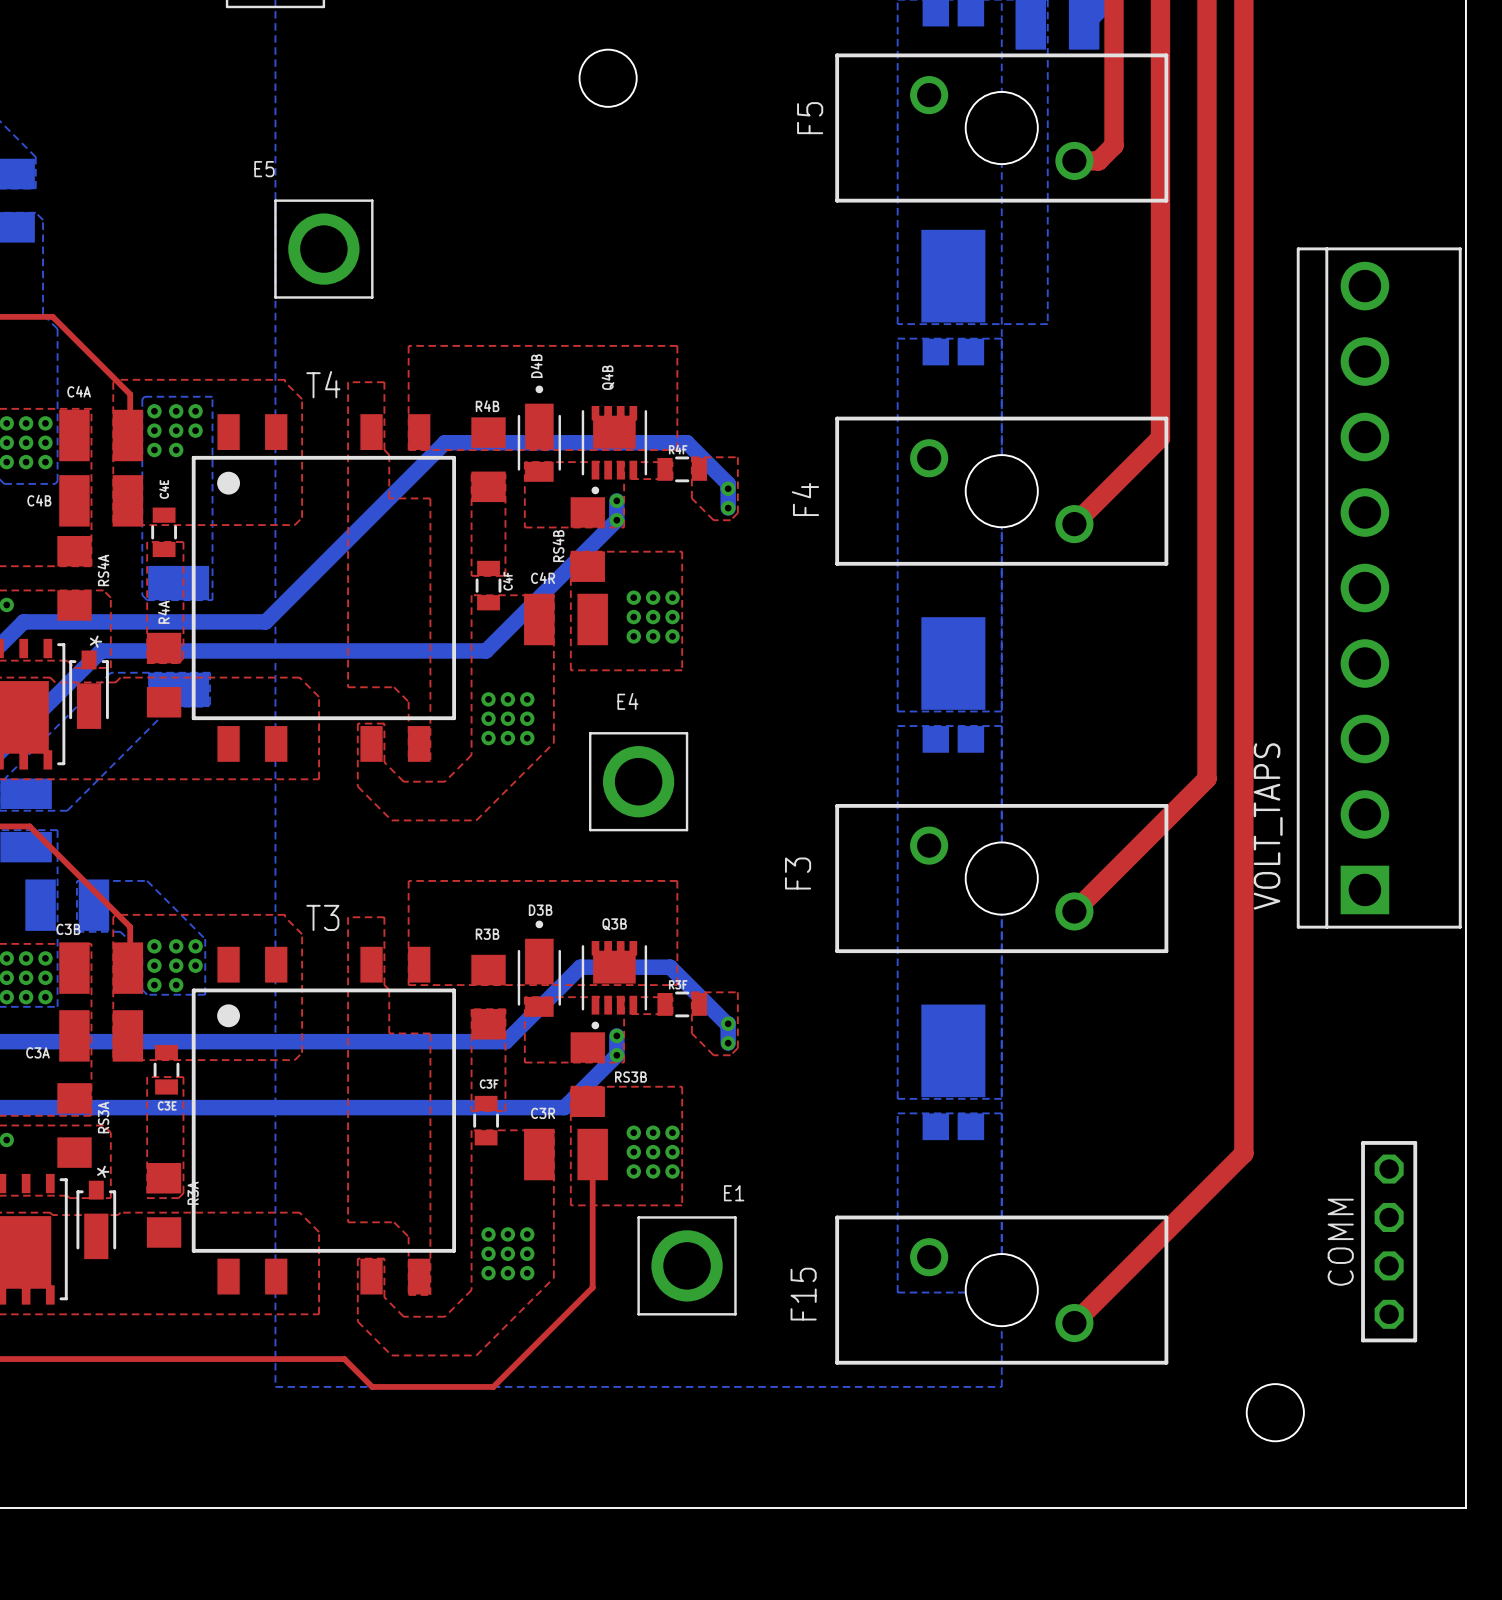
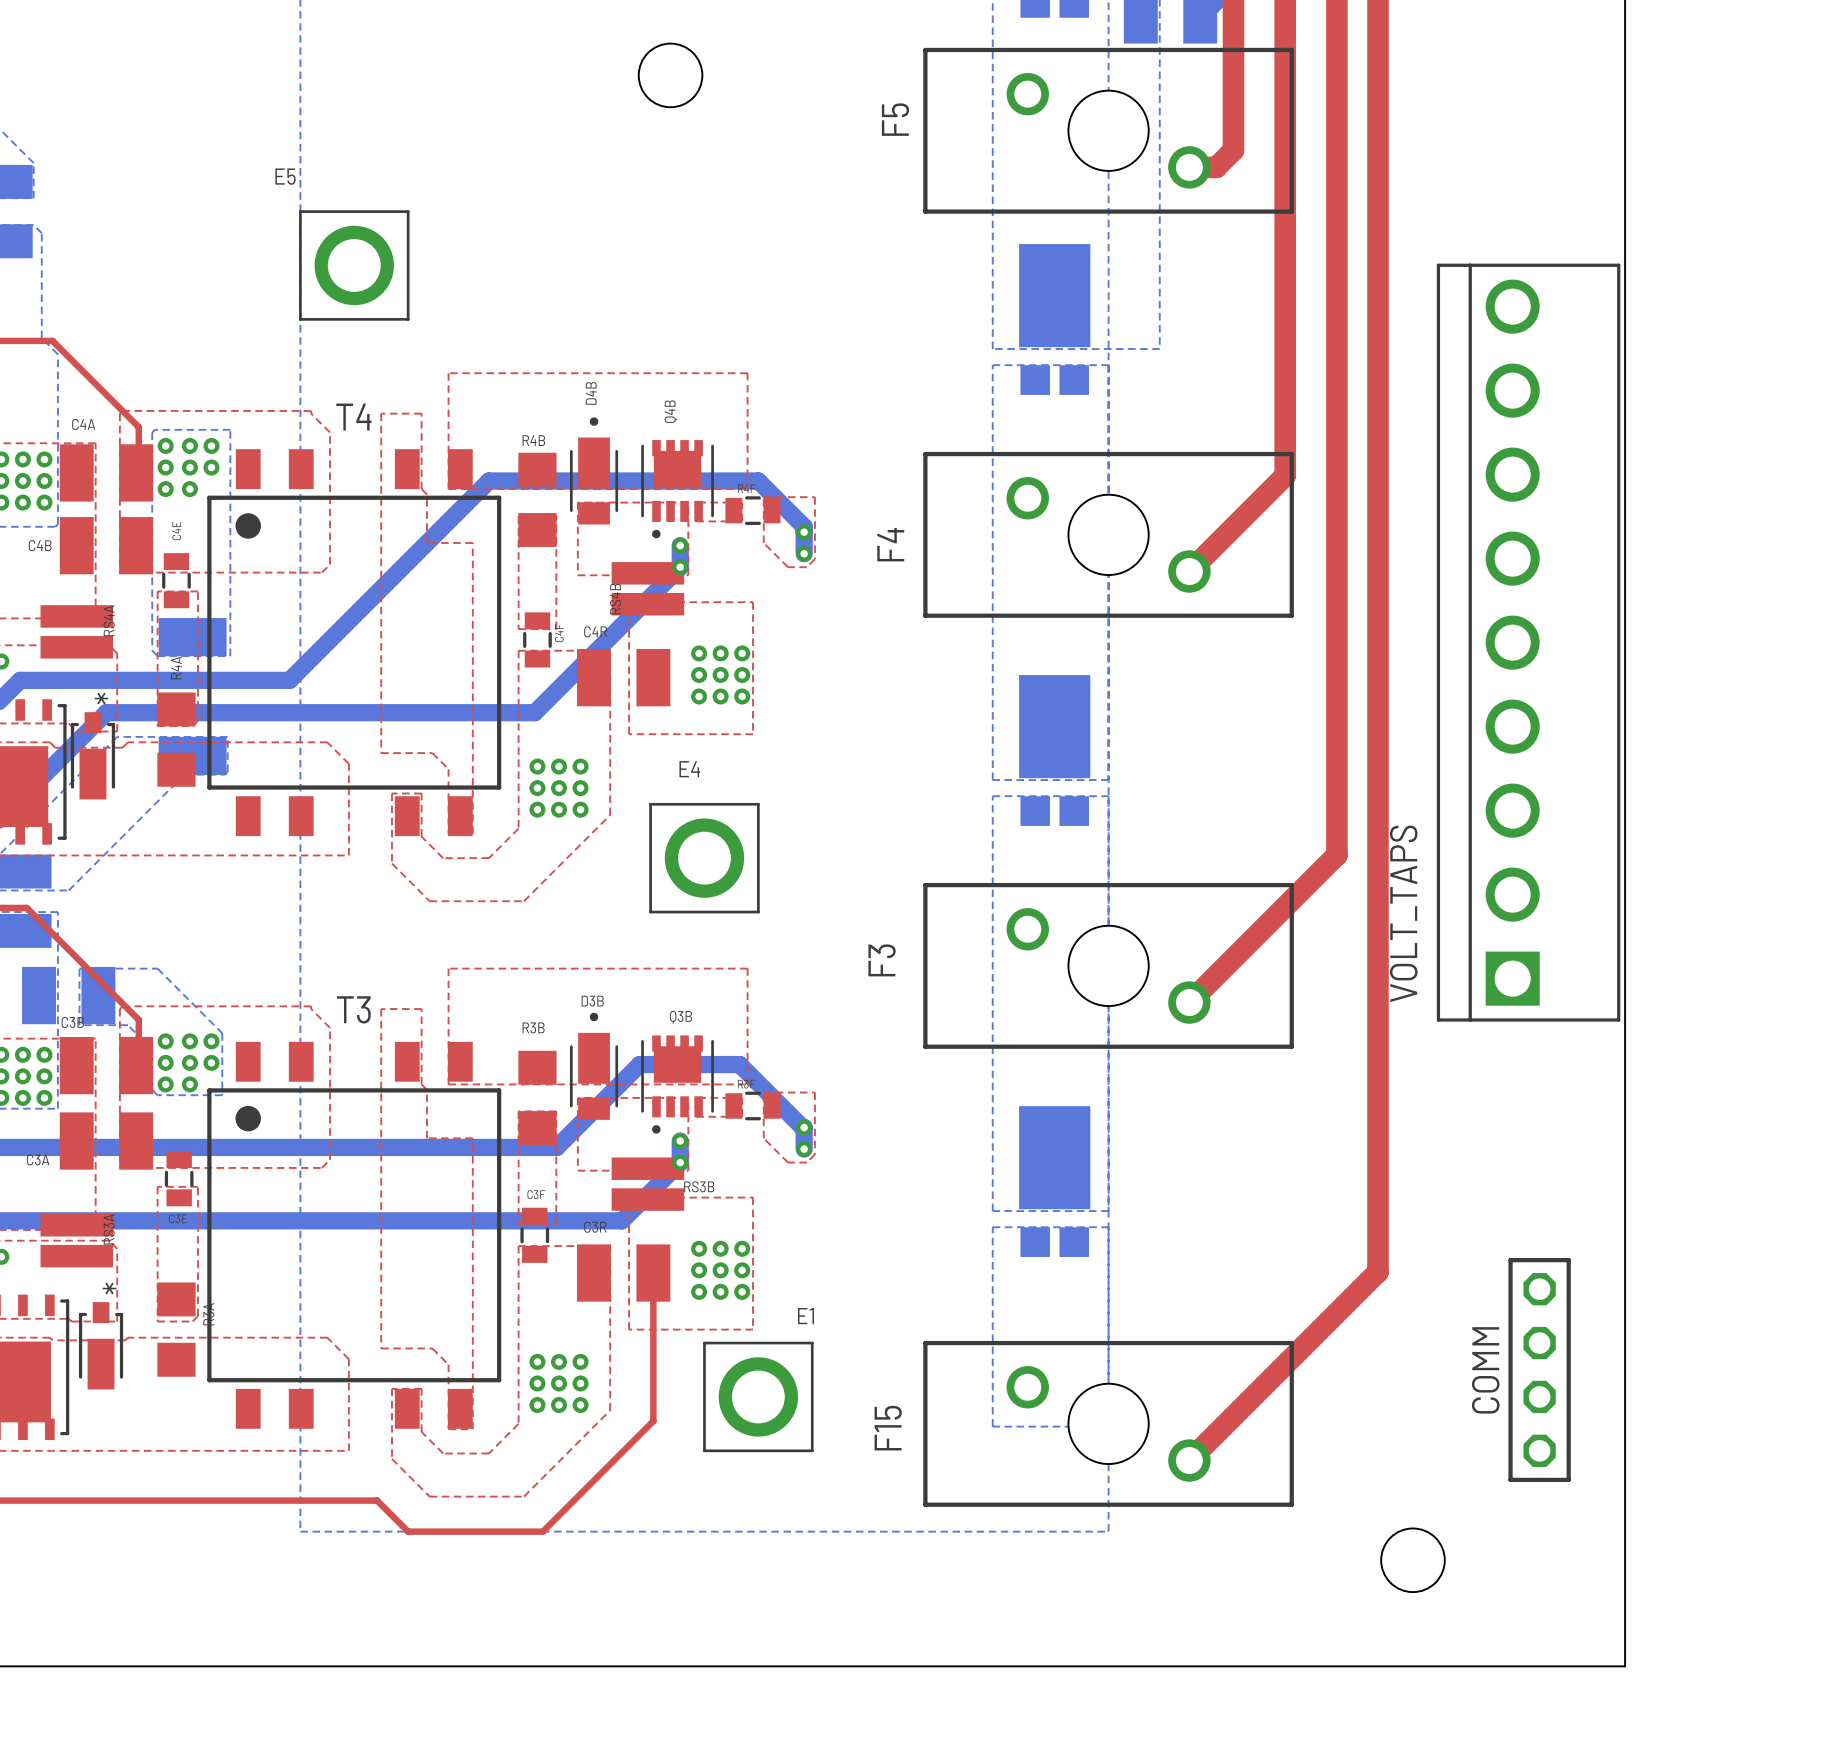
RS4B footprint: [570, 497, 605, 582] -> [611, 562, 685, 616]
RS4A footprint: [57, 535, 92, 621] -> [40, 605, 114, 659]
RS3B footprint: [570, 1032, 605, 1118] -> [611, 1157, 685, 1211]
RS3A footprint: [57, 1083, 92, 1168] -> [40, 1214, 114, 1268]

